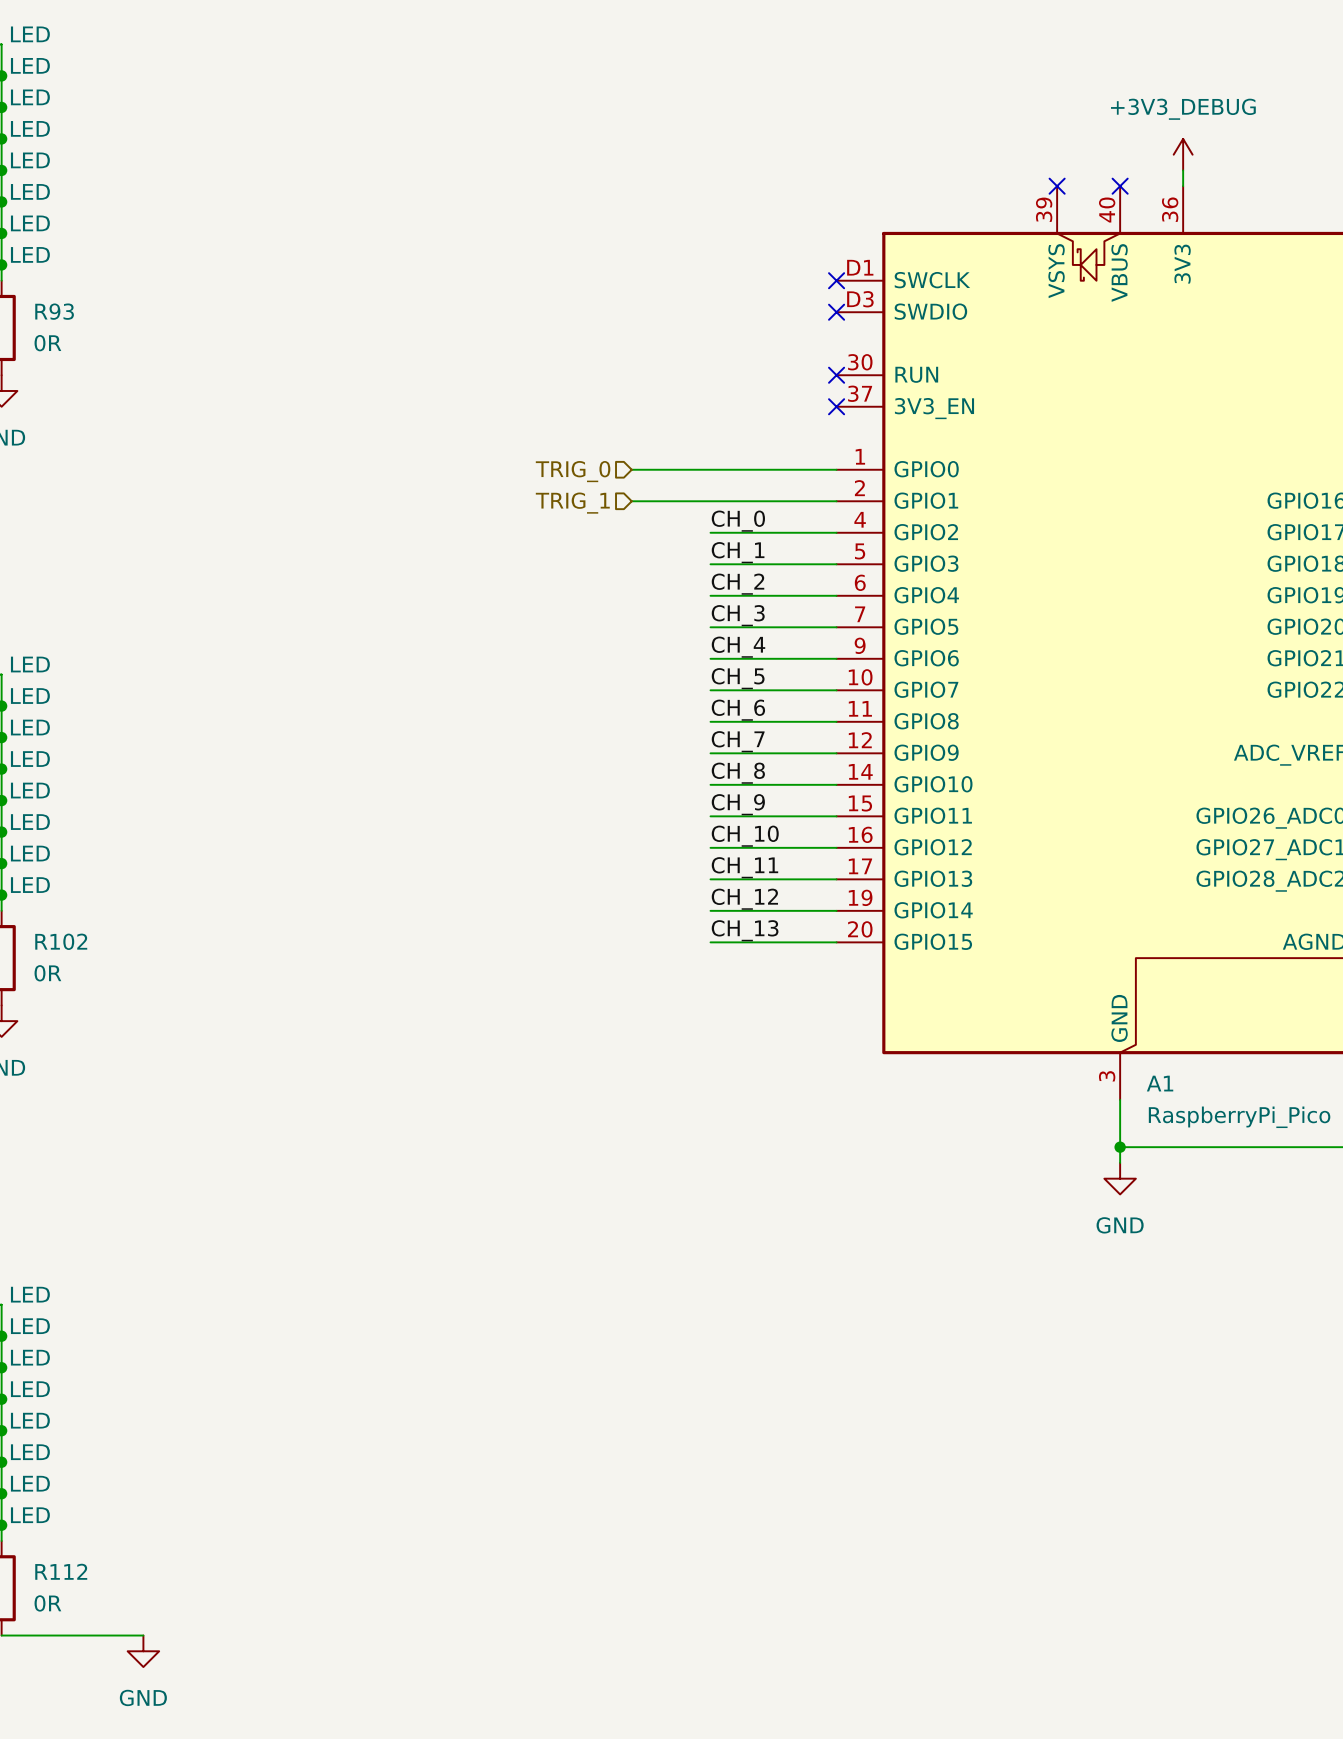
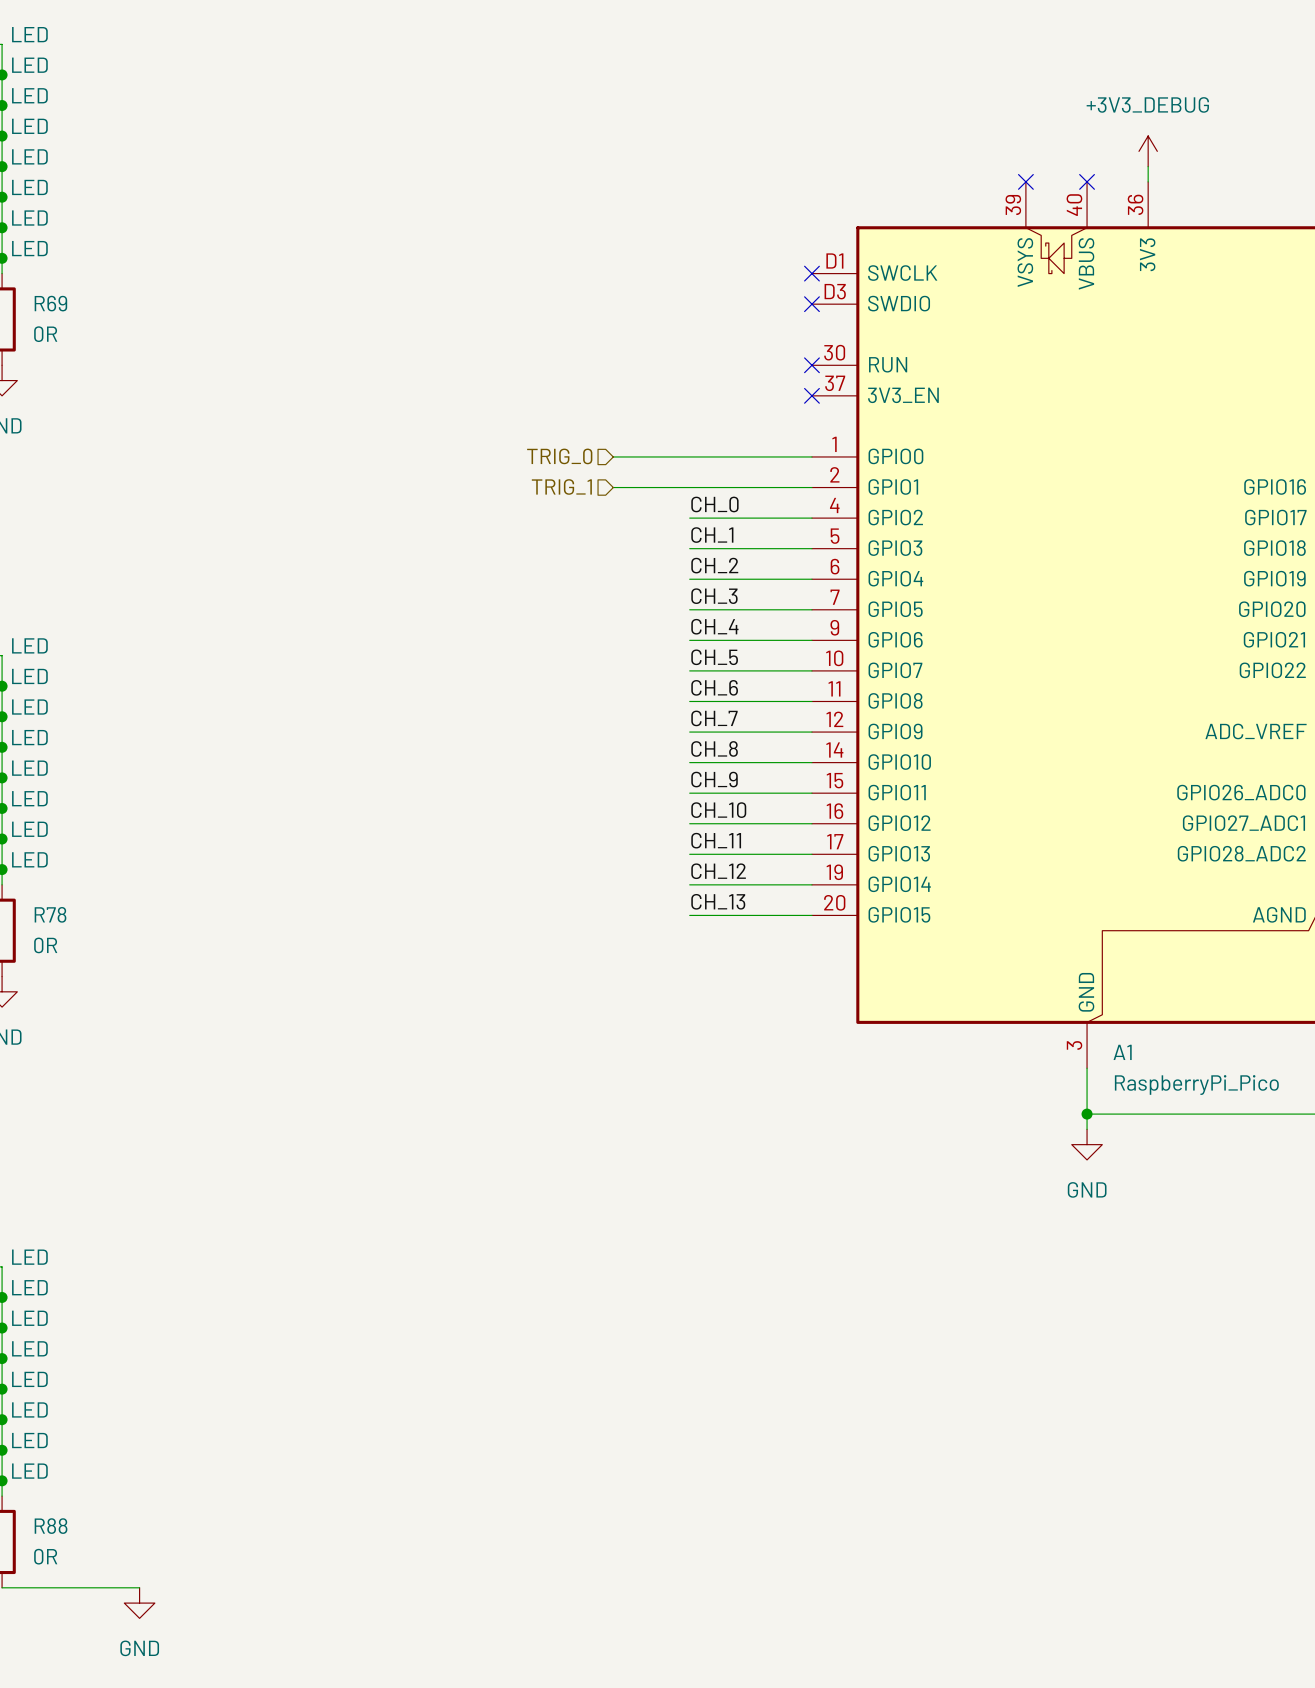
R93 name: R93 (54, 311) -> R69 (50, 303)
R102 name: R102 (61, 941) -> R78 (50, 914)
R112 name: R112 (61, 1571) -> R88 (51, 1526)

